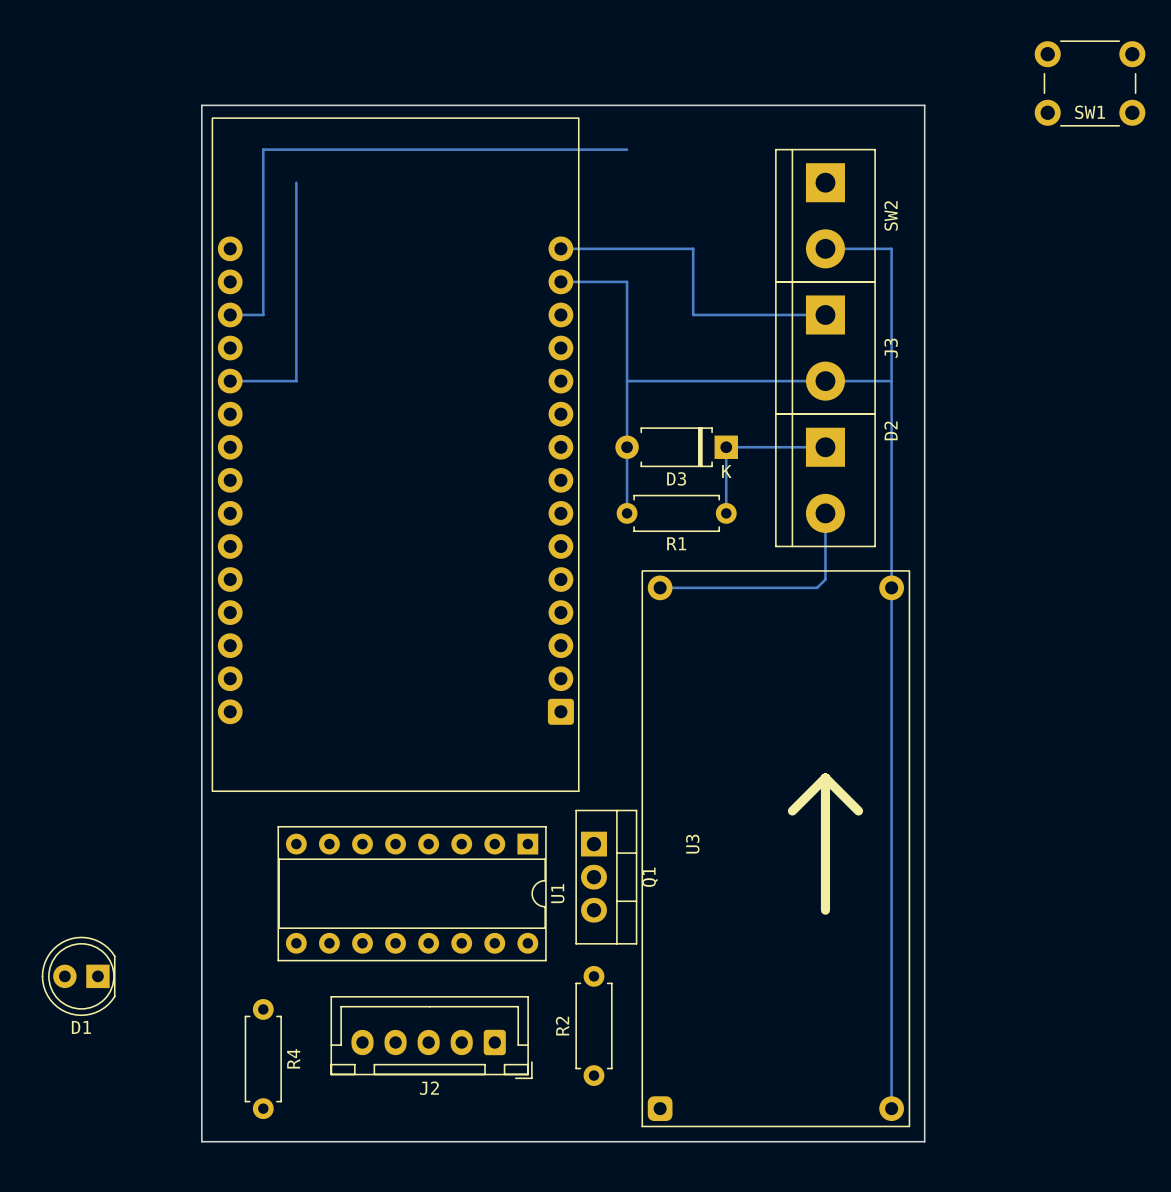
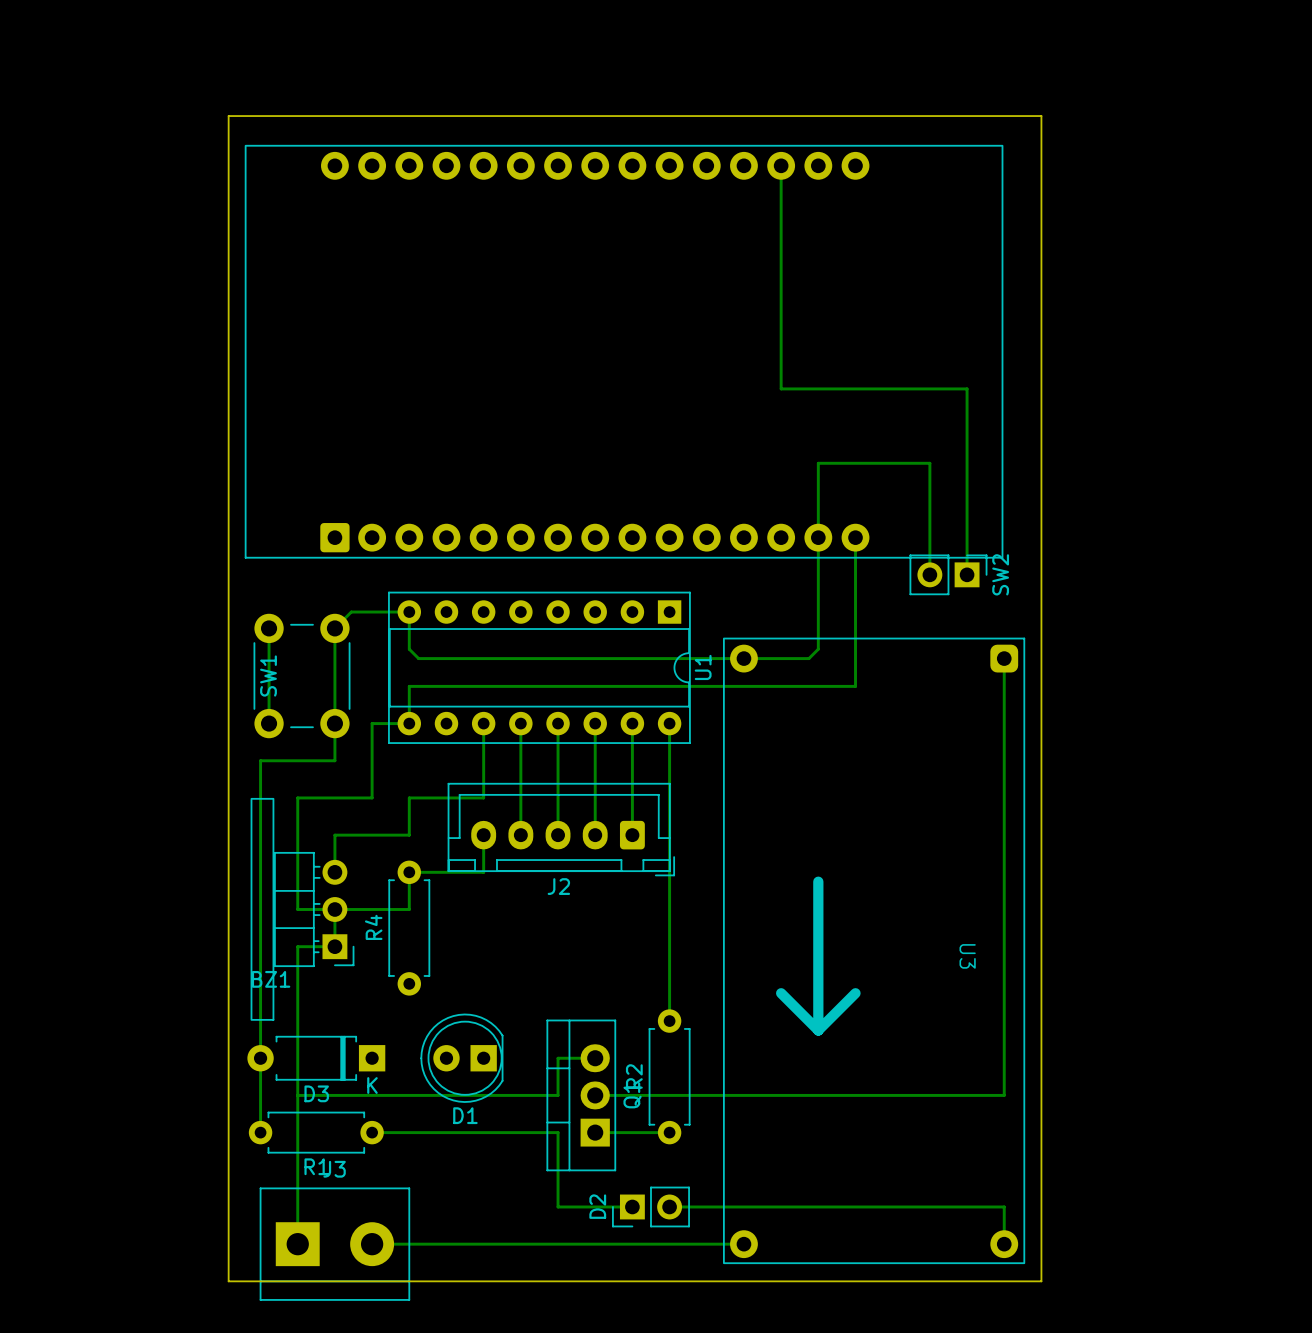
SW1 rotation: 0° (1090, 83) -> 90° clockwise (301, 676)
SW1 position: (1090, 83) -> (301, 676)
SW2 footprint: [775, 148, 876, 283] -> [909, 554, 988, 596]
bottom track: (627, 149) (263, 149) (263, 314) (230, 314) -> none
bottom track: (296, 182) (296, 381) (230, 381) -> none
bottom track: (560, 248) (693, 248) -> (781, 165) (781, 277)
bottom track: (825, 248) (891, 248) (891, 587) -> none
bottom track: (560, 281) (627, 281) (627, 513) -> none
bottom track: (693, 314) (825, 314) -> (781, 351) (781, 388) (967, 388) (967, 574)
J3 rotation: 0° (825, 348) -> 90° counterclockwise (334, 1244)
J3 position: (825, 348) -> (334, 1244)
bottom track: (627, 381) (891, 381) -> none
D2 footprint: [775, 413, 876, 548] -> [612, 1186, 690, 1228]
D2 name position: D2 (891, 430) -> D2 (597, 1206)
D3 position: (676, 447) -> (316, 1058)
bottom track: (726, 447) (825, 447) -> (818, 500) (818, 463) (929, 463) (929, 574)
part rotation: 0° (395, 454) -> 90° clockwise (624, 351)
bottom track: none -> (855, 537) (855, 686) (409, 686) (409, 723) (372, 723) (372, 797) (297, 797) (297, 909) (409, 909) (409, 872) (483, 872) (483, 835)
R1 position: (676, 513) -> (316, 1132)
bottom track: (825, 513) (825, 579) (817, 587) (717, 587) -> (818, 574) (818, 649) (808, 658)
bottom track: none -> (269, 628) (269, 723)
bottom track: none -> (743, 658) (418, 658) (409, 649) (409, 612) (351, 612) (334, 628) (334, 760) (260, 760) (260, 1132)
bottom track: none -> (483, 723) (483, 797) (409, 797) (409, 835) (334, 835) (334, 872)
bottom track: none -> (520, 723) (520, 835)
bottom track: none -> (558, 723) (558, 835)
bottom track: none -> (595, 723) (595, 835)
bottom track: none -> (632, 723) (632, 835)
bottom track: none -> (669, 723) (669, 1021)
BZ1: none -> (302, 909)
bottom track: none -> (334, 909) (334, 946) (297, 946) (297, 1244)
U3 rotation: 0° (775, 848) -> 180° (874, 950)
Q1 rotation: 0° (606, 877) -> 180° (581, 1095)
Q1 position: (606, 877) -> (581, 1095)
U1 position: (412, 893) -> (539, 667)
bottom track: none -> (595, 1058) (558, 1058) (558, 1095) (297, 1095)
D1 position: (78, 976) -> (461, 1058)
bottom track: none -> (595, 1095) (1004, 1095)
bottom track: (891, 976) (891, 1075) -> (669, 1206) (1004, 1206)
bottom track: none -> (372, 1132) (558, 1132) (558, 1206) (632, 1206)
bottom track: none -> (595, 1132) (669, 1132)
R2 position: (593, 1025) -> (669, 1076)
J2 position: (431, 1037) -> (561, 829)
R4 name position: R4 (293, 1058) -> R4 (373, 927)
R4 position: (263, 1059) -> (409, 928)
bottom track: none -> (372, 1244) (743, 1244)

